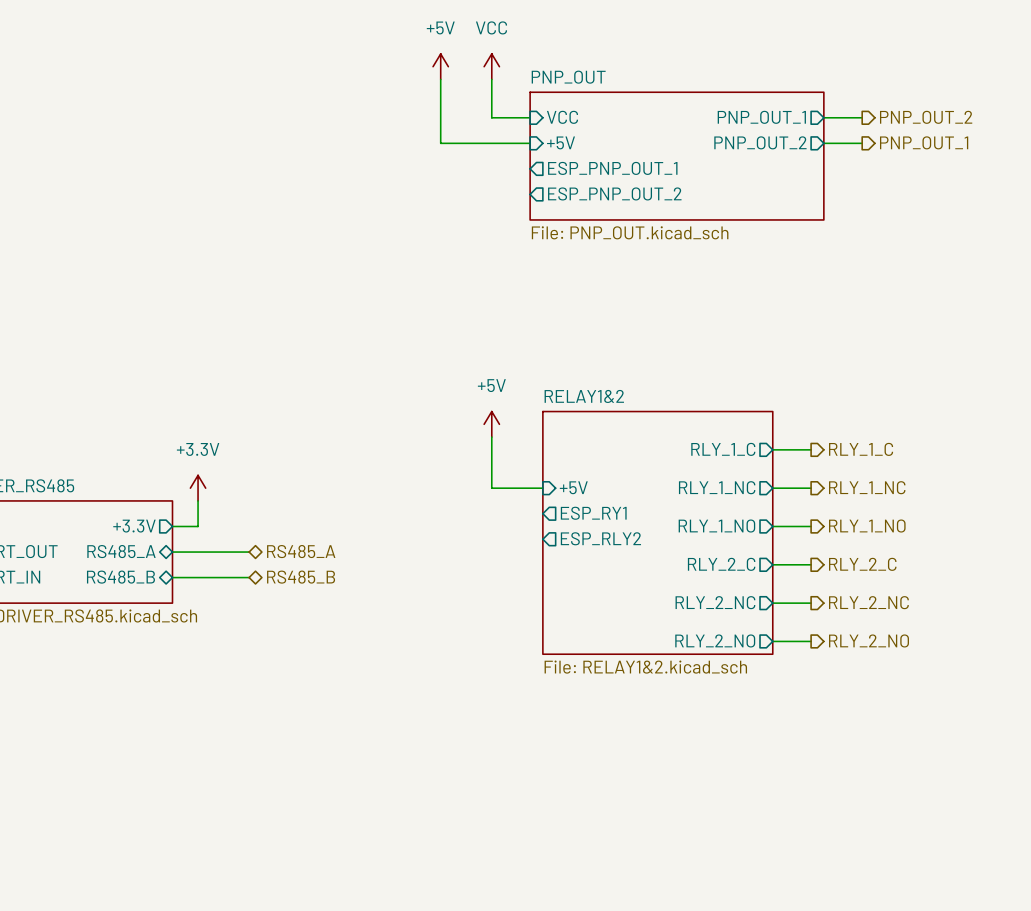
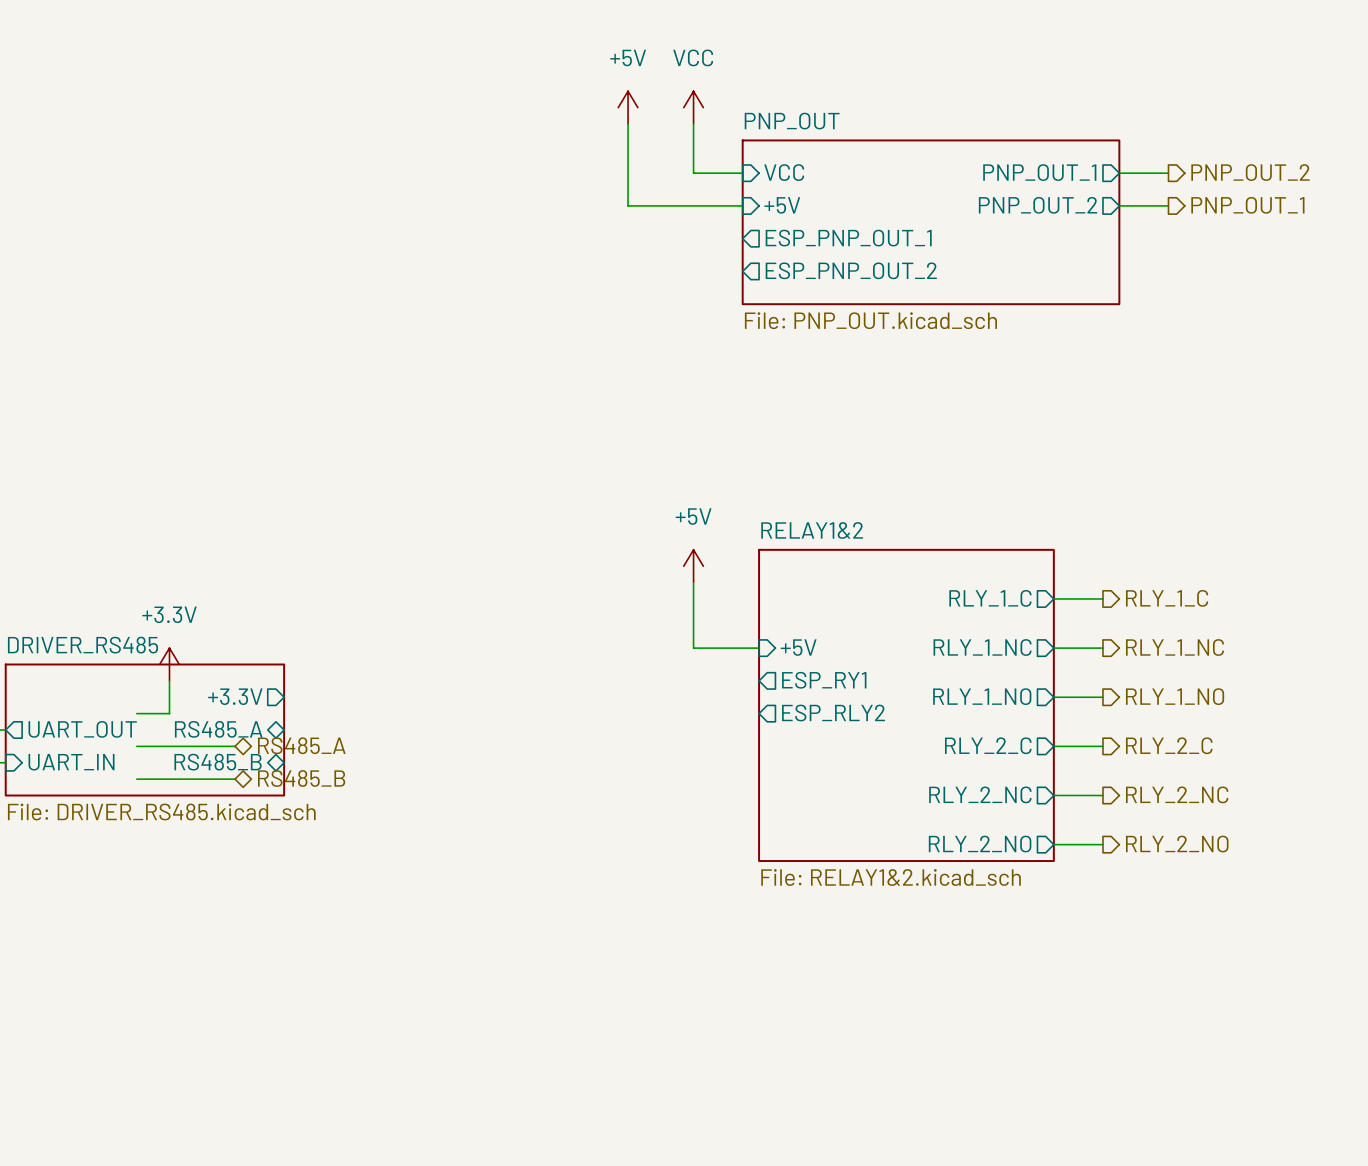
power symbol position: +3.3V (198, 488) -> +3.3V (169, 664)
wire: (198, 500) (198, 526) (172, 526) -> (169, 680) (169, 713) (136, 713)
hierarchical label position: RS485_A (301, 551) -> RS485_A (301, 745)
wire: (172, 552) (249, 552) -> (136, 746) (235, 746)
wire: (172, 577) (249, 577) -> (136, 779) (235, 779)
hierarchical label position: RS485_B (301, 577) -> RS485_B (301, 778)

